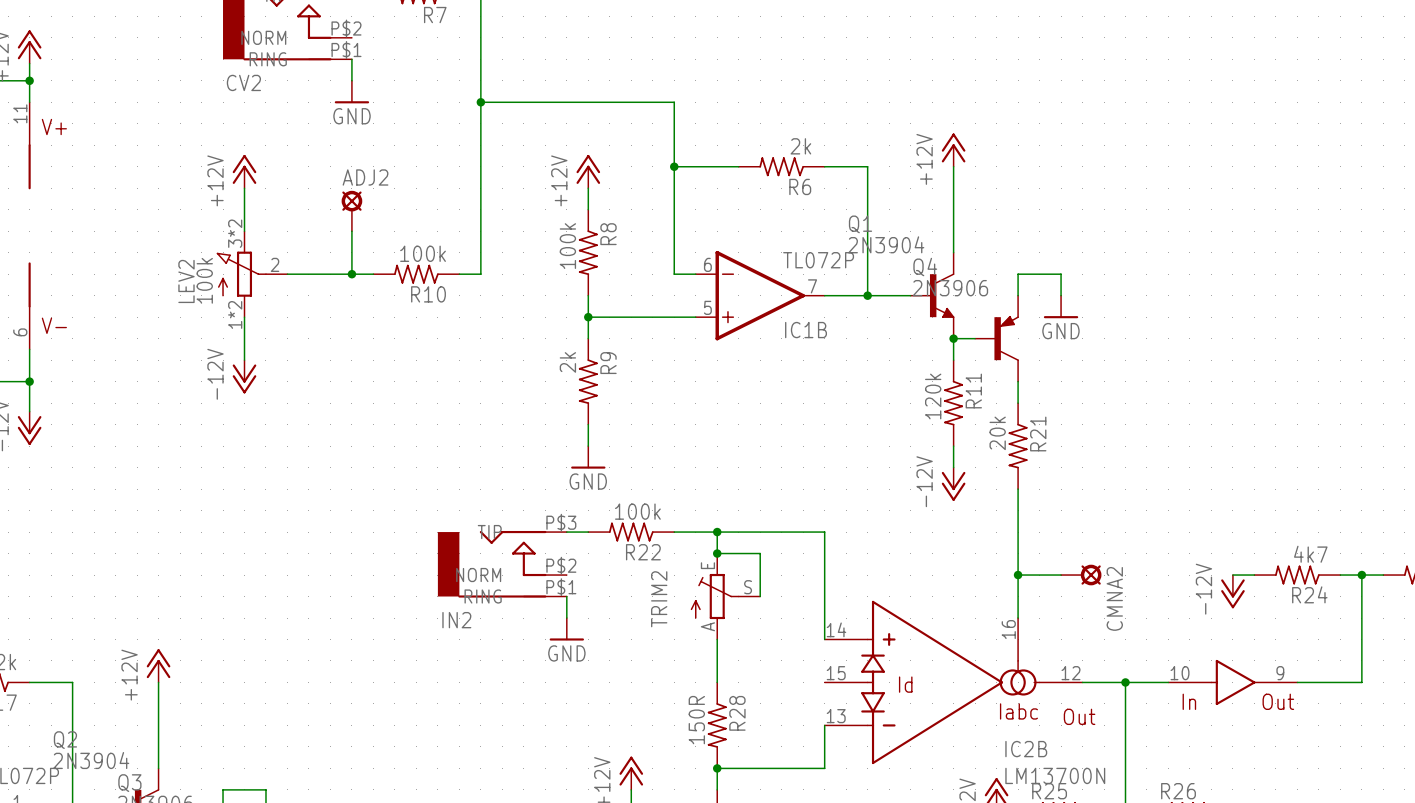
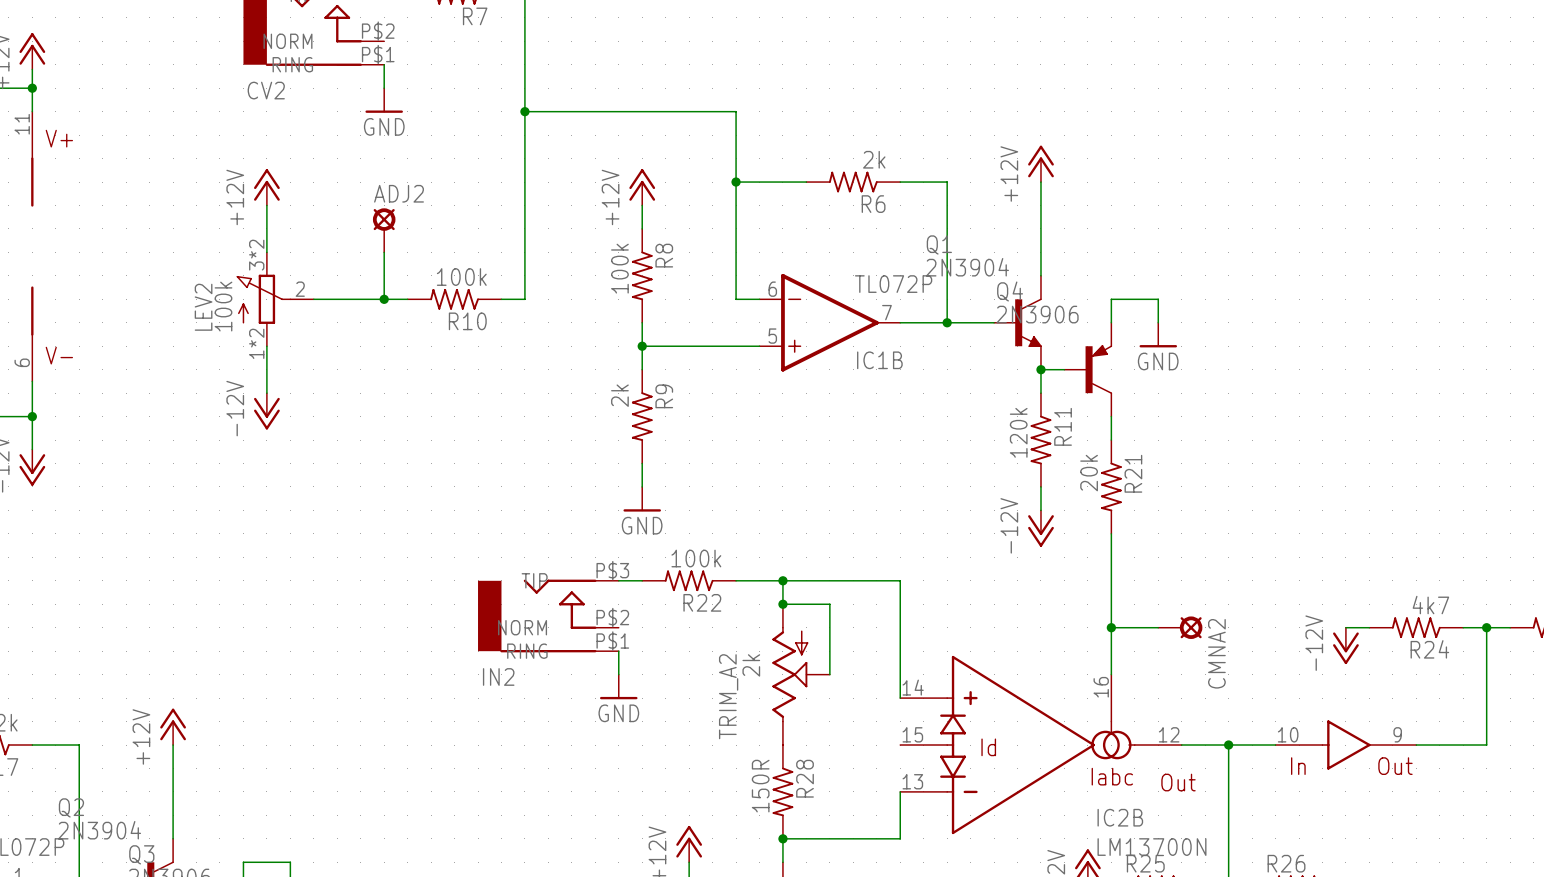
TRIM2: (725, 596) -> none
wire: none -> (829, 651) (829, 674)
TRIM_A2: none -> 2k (801, 674)

